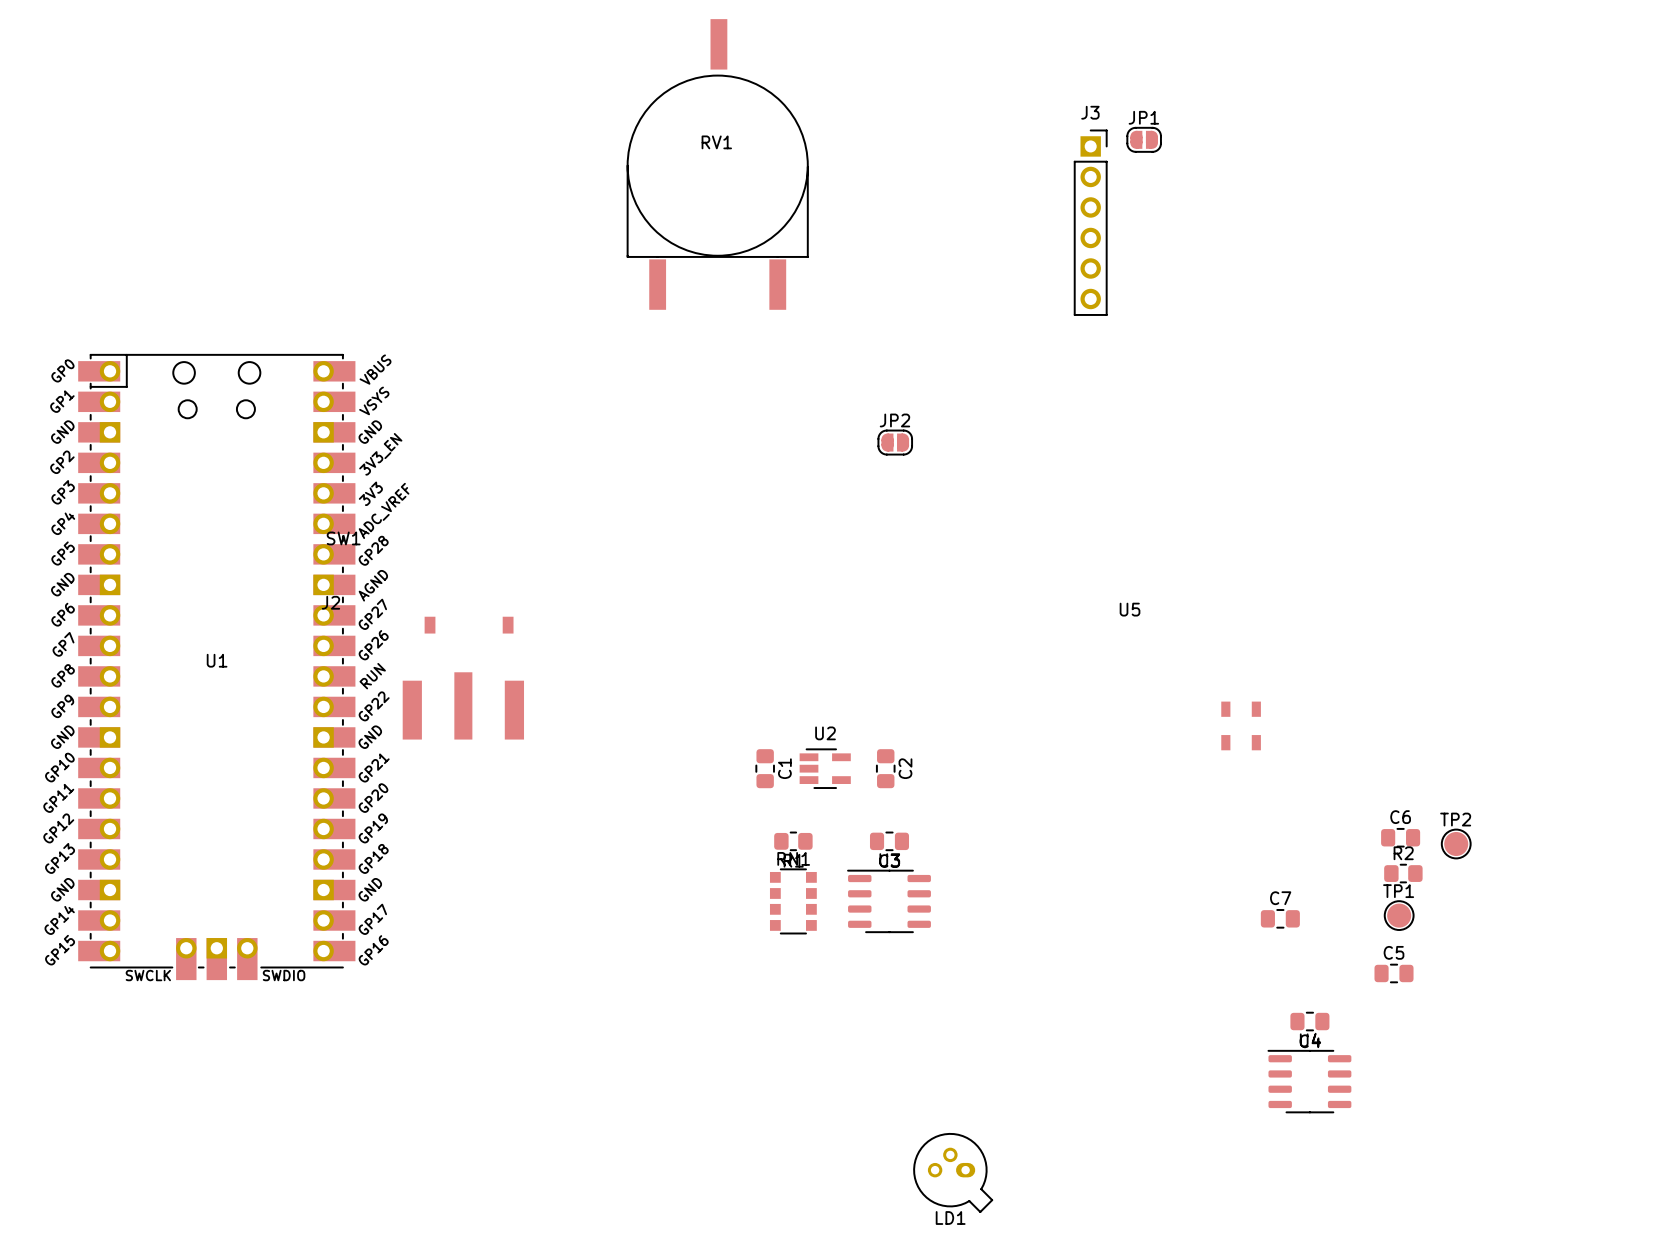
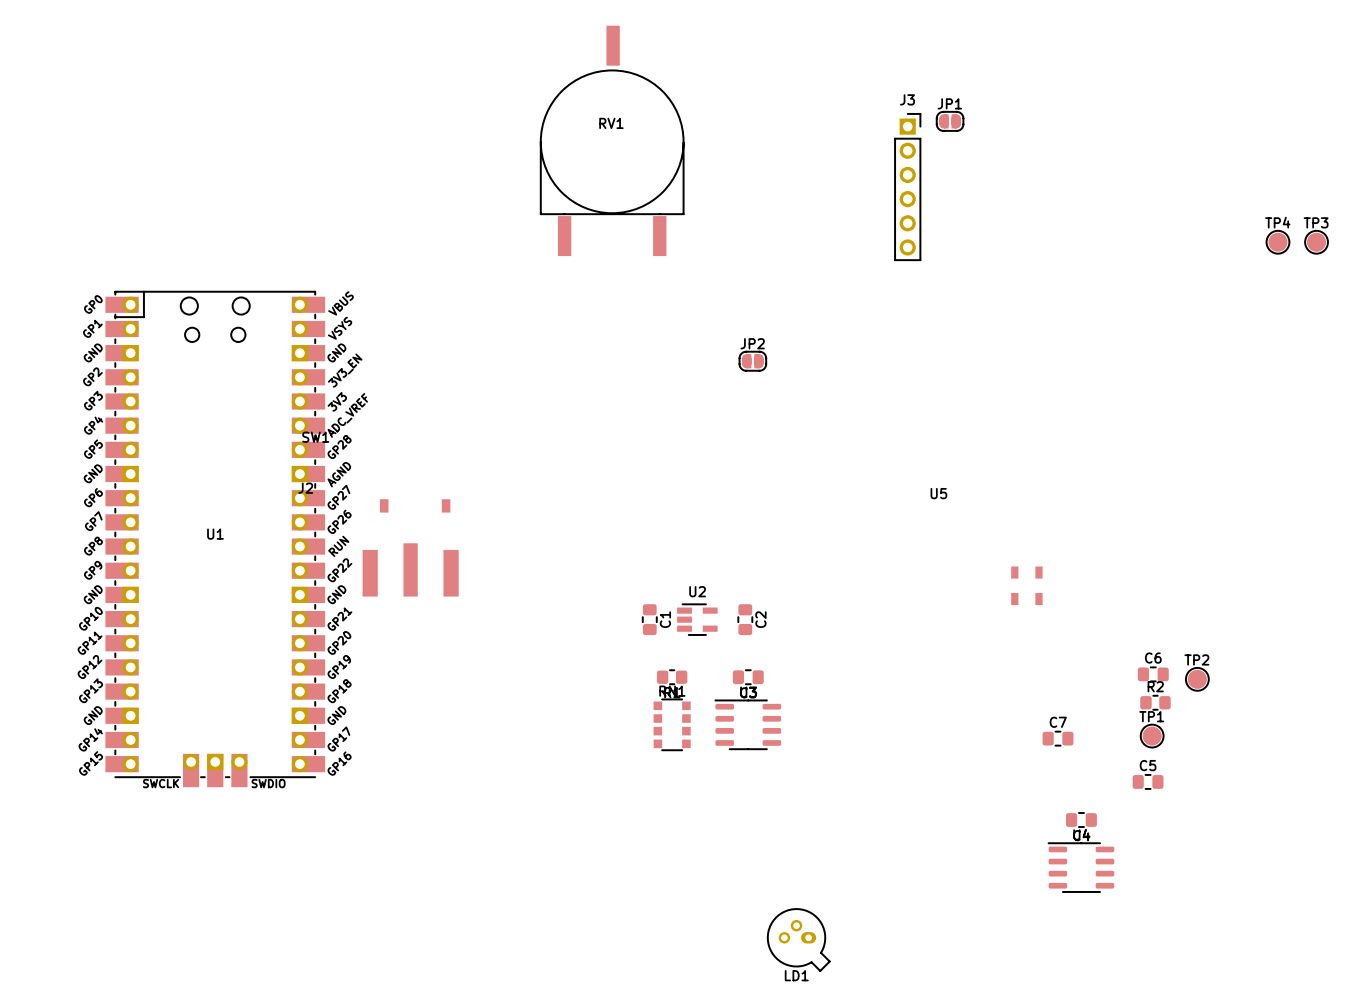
TP4: none -> (1277, 242)
TP3: none -> (1316, 242)

